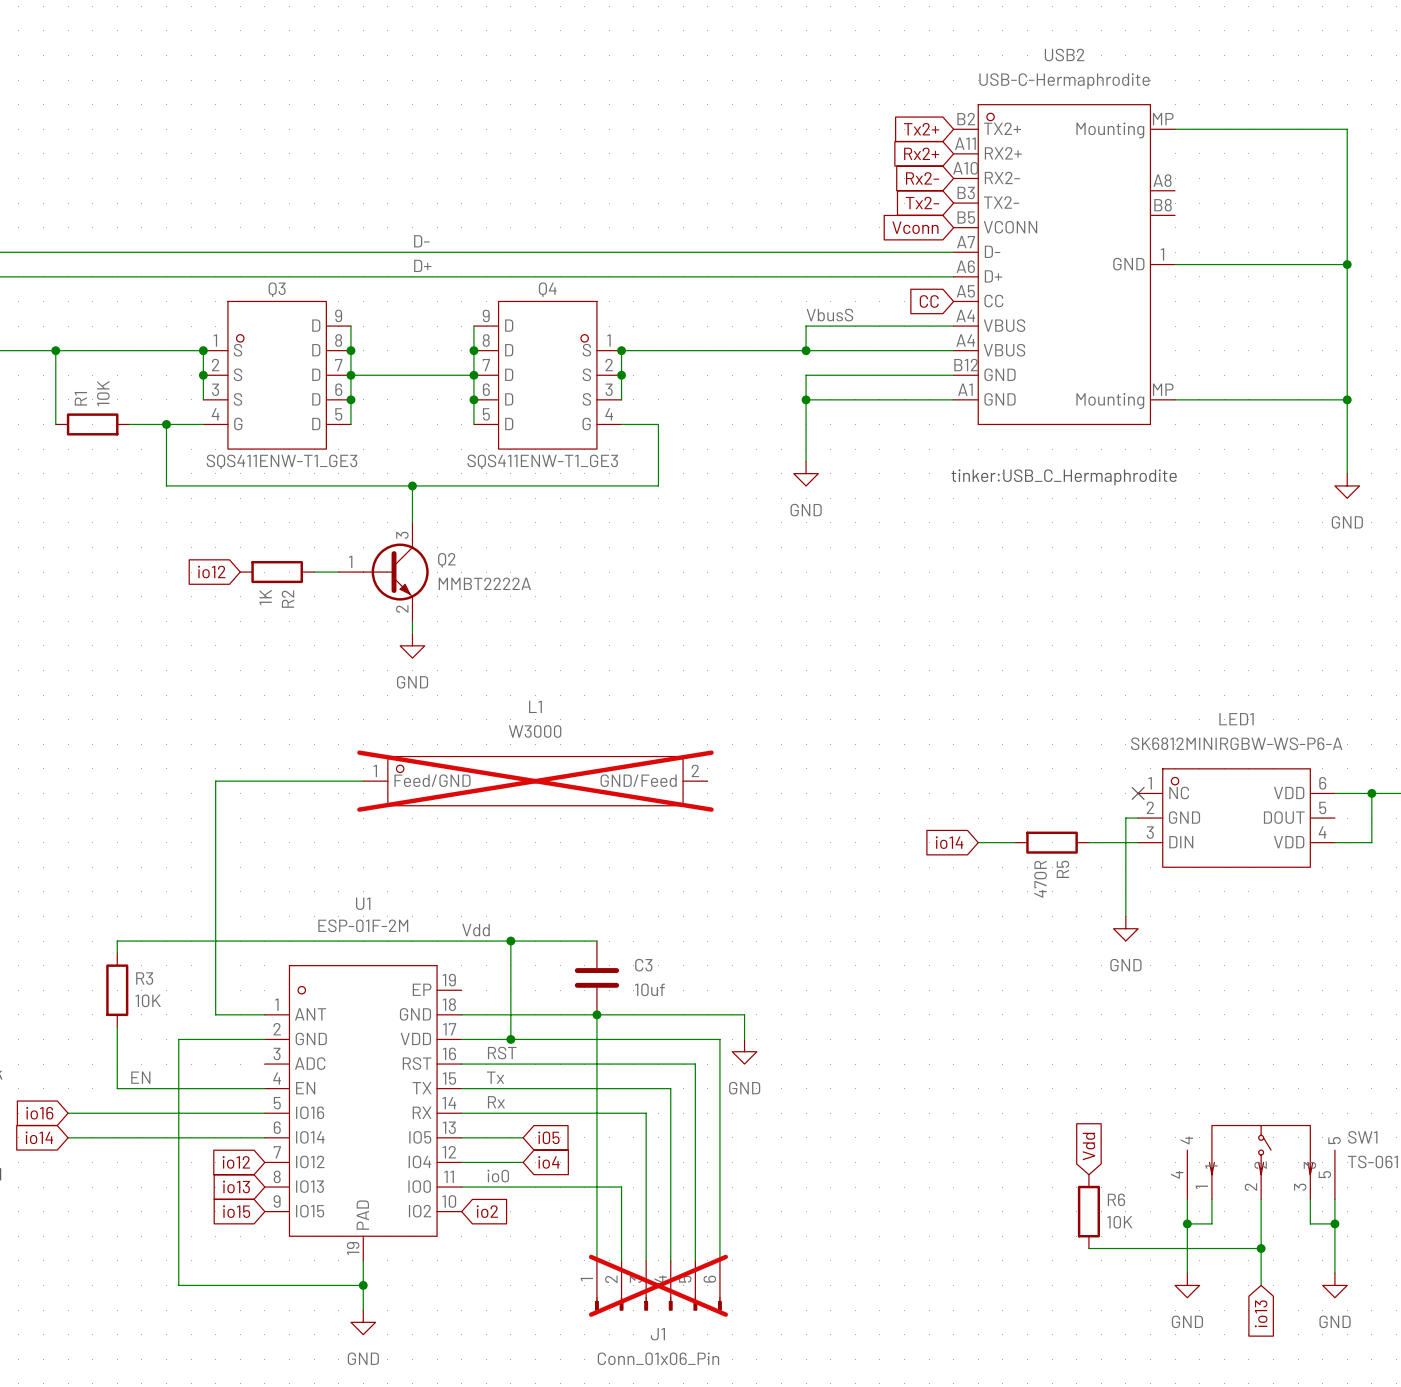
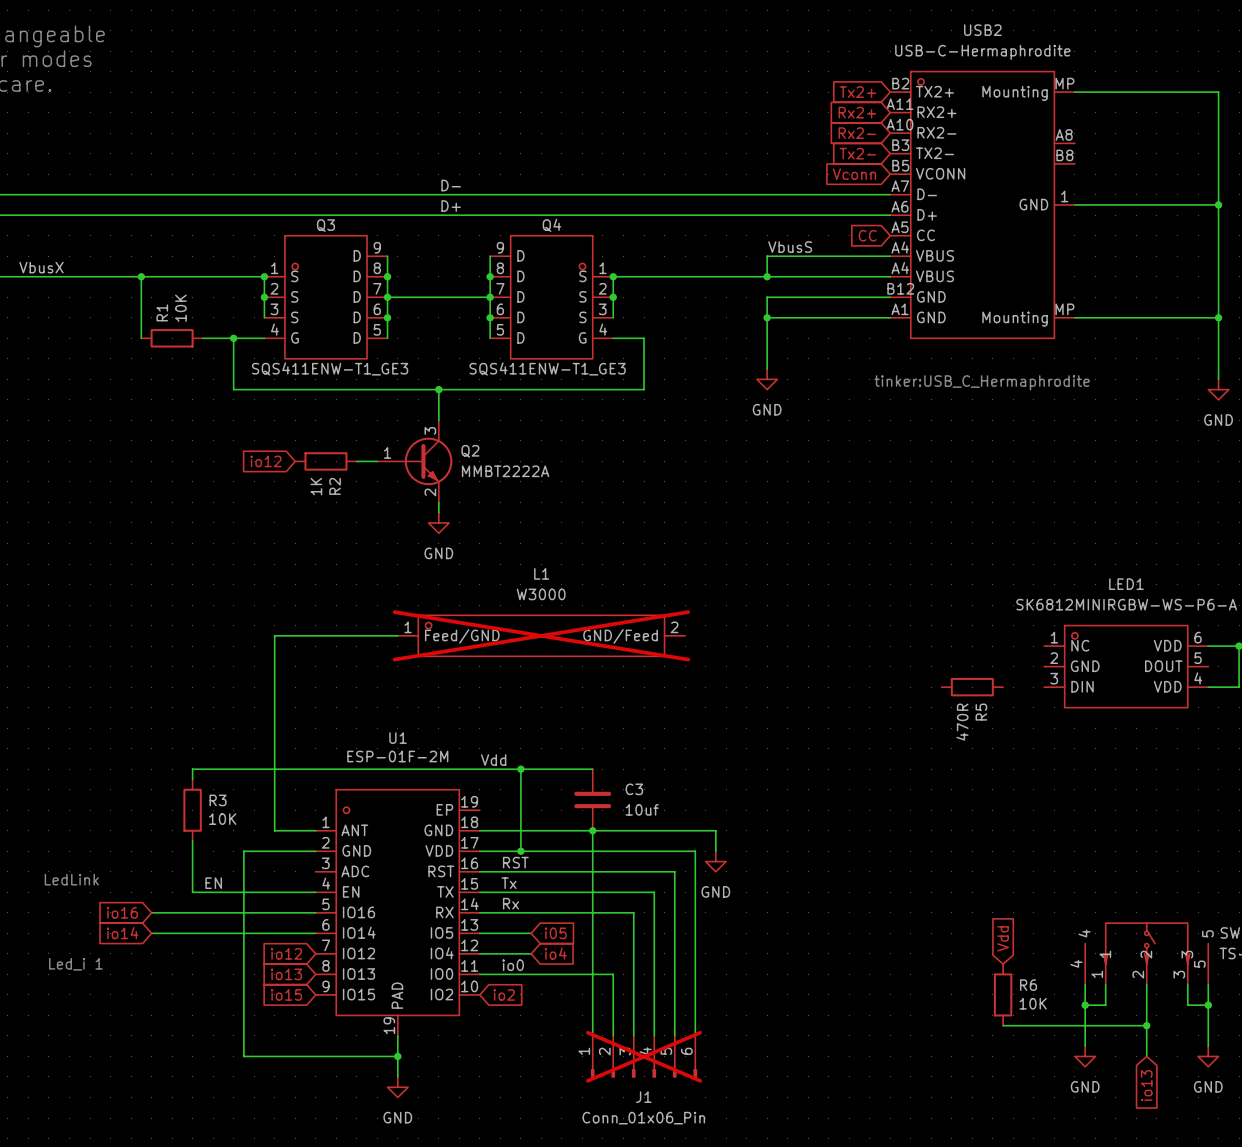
no-connect mark: (1138, 793) -> none
wire: (1138, 818) (1125, 818) (1125, 916) -> none
global label: io14 (949, 842) -> none
wire: (978, 842) (1015, 842) -> none
wire: (1088, 842) (1138, 842) -> none
power symbol: GND (1125, 928) -> none

